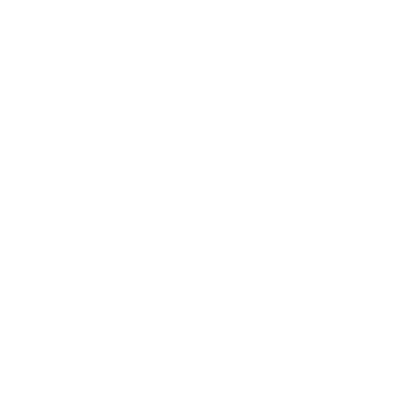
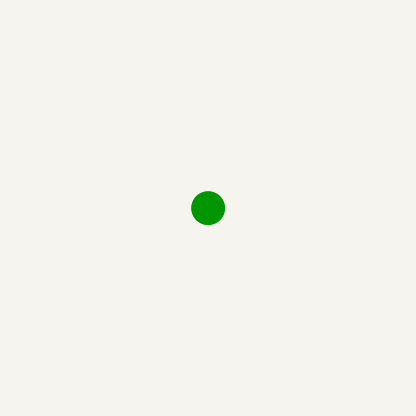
junction: none -> (208, 208)

